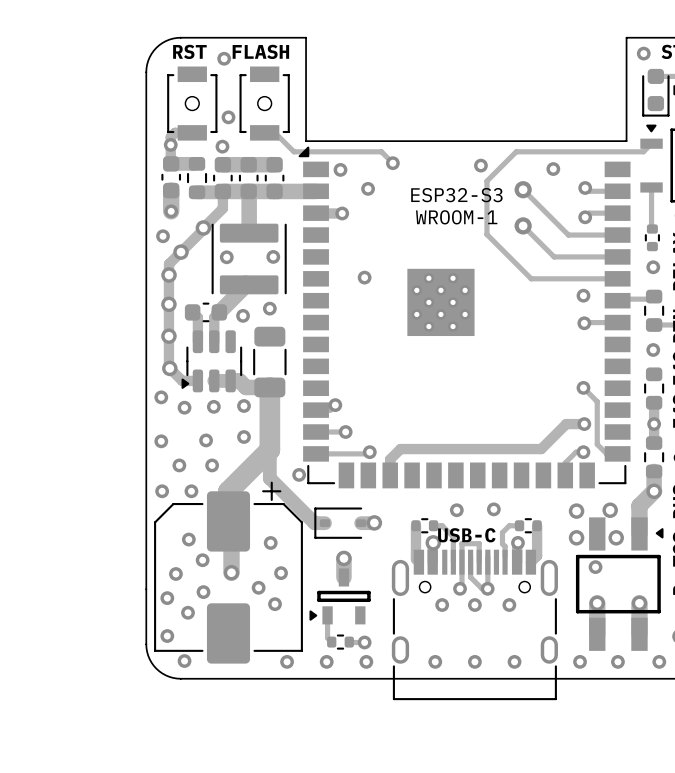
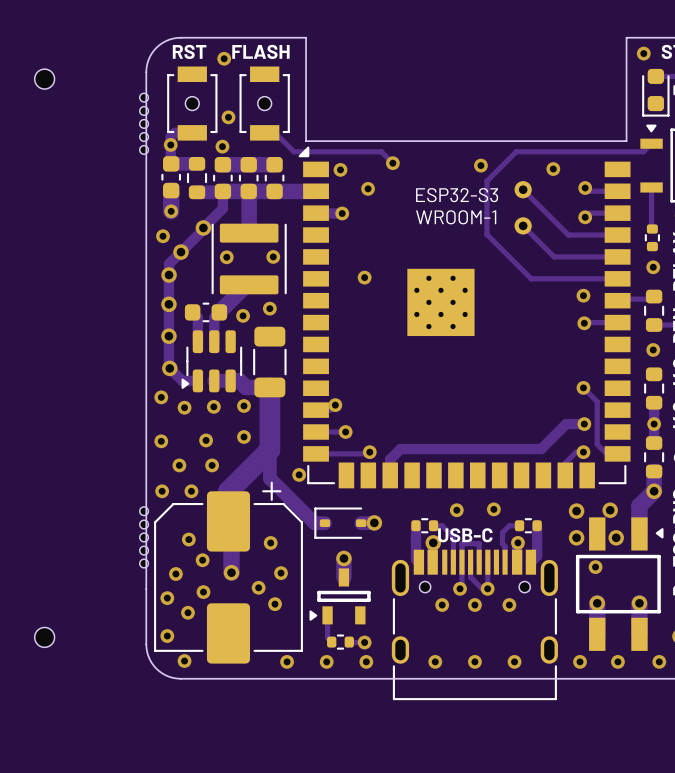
part: none -> (44, 79)
part: none -> (144, 123)
part: none -> (144, 537)
part: none -> (44, 637)

